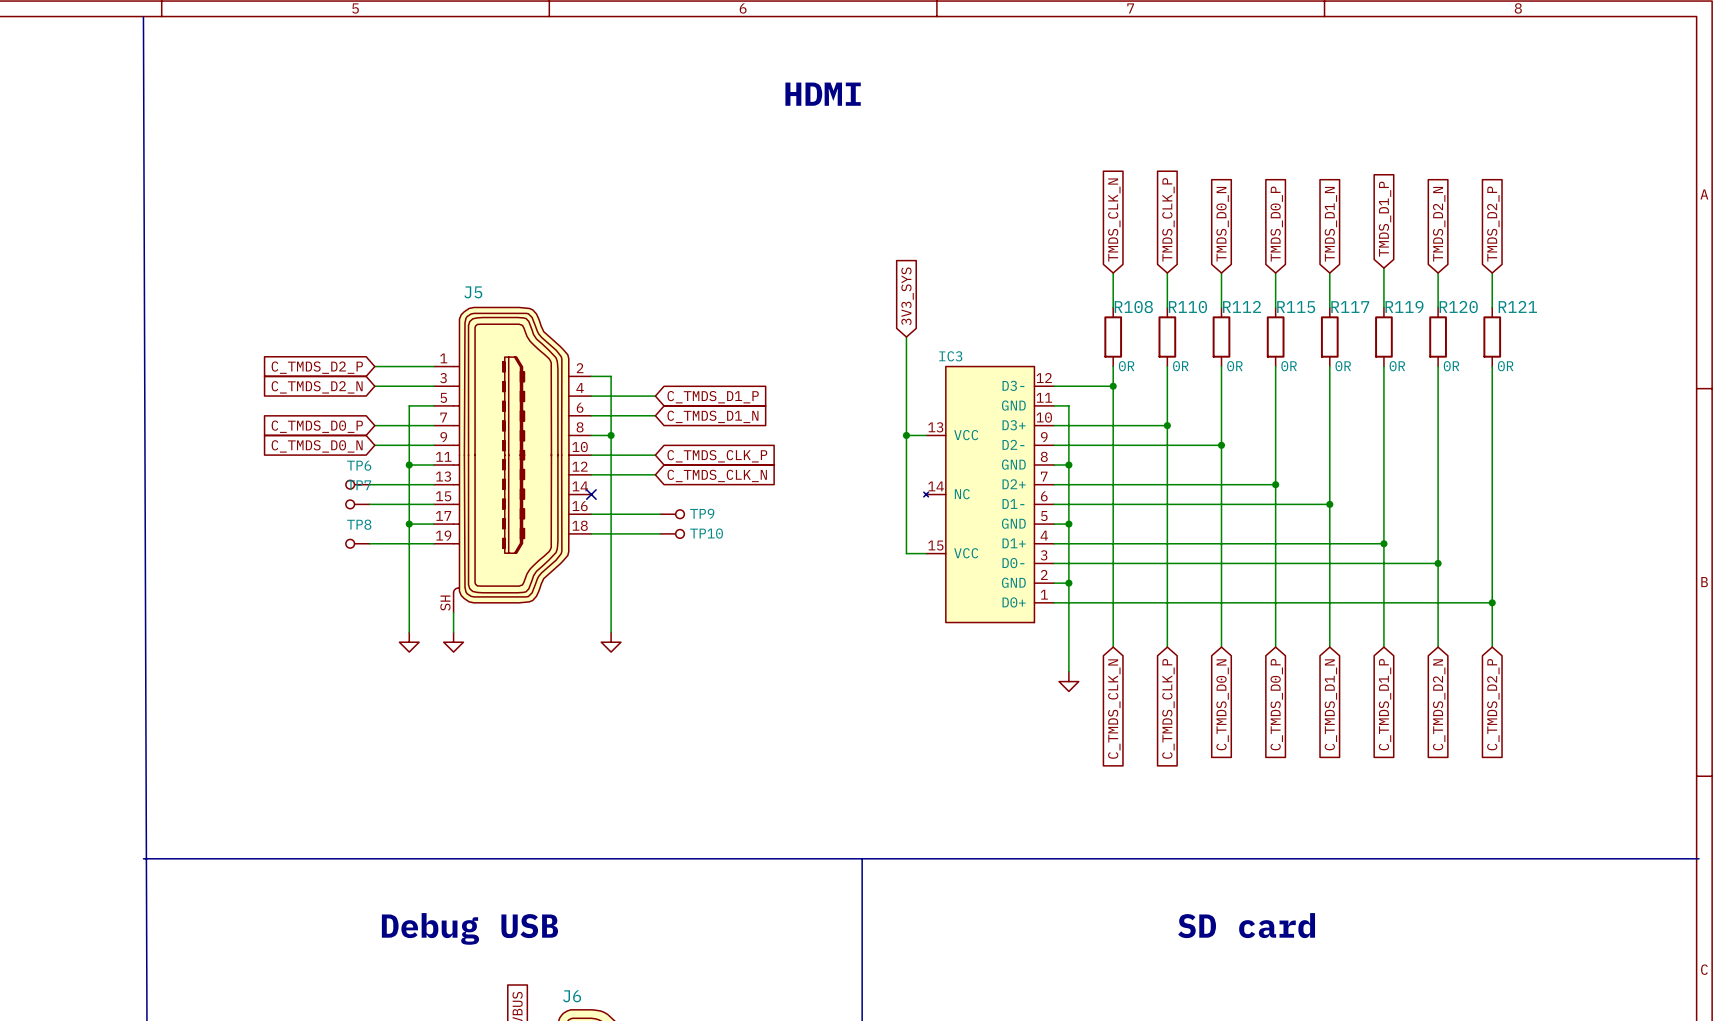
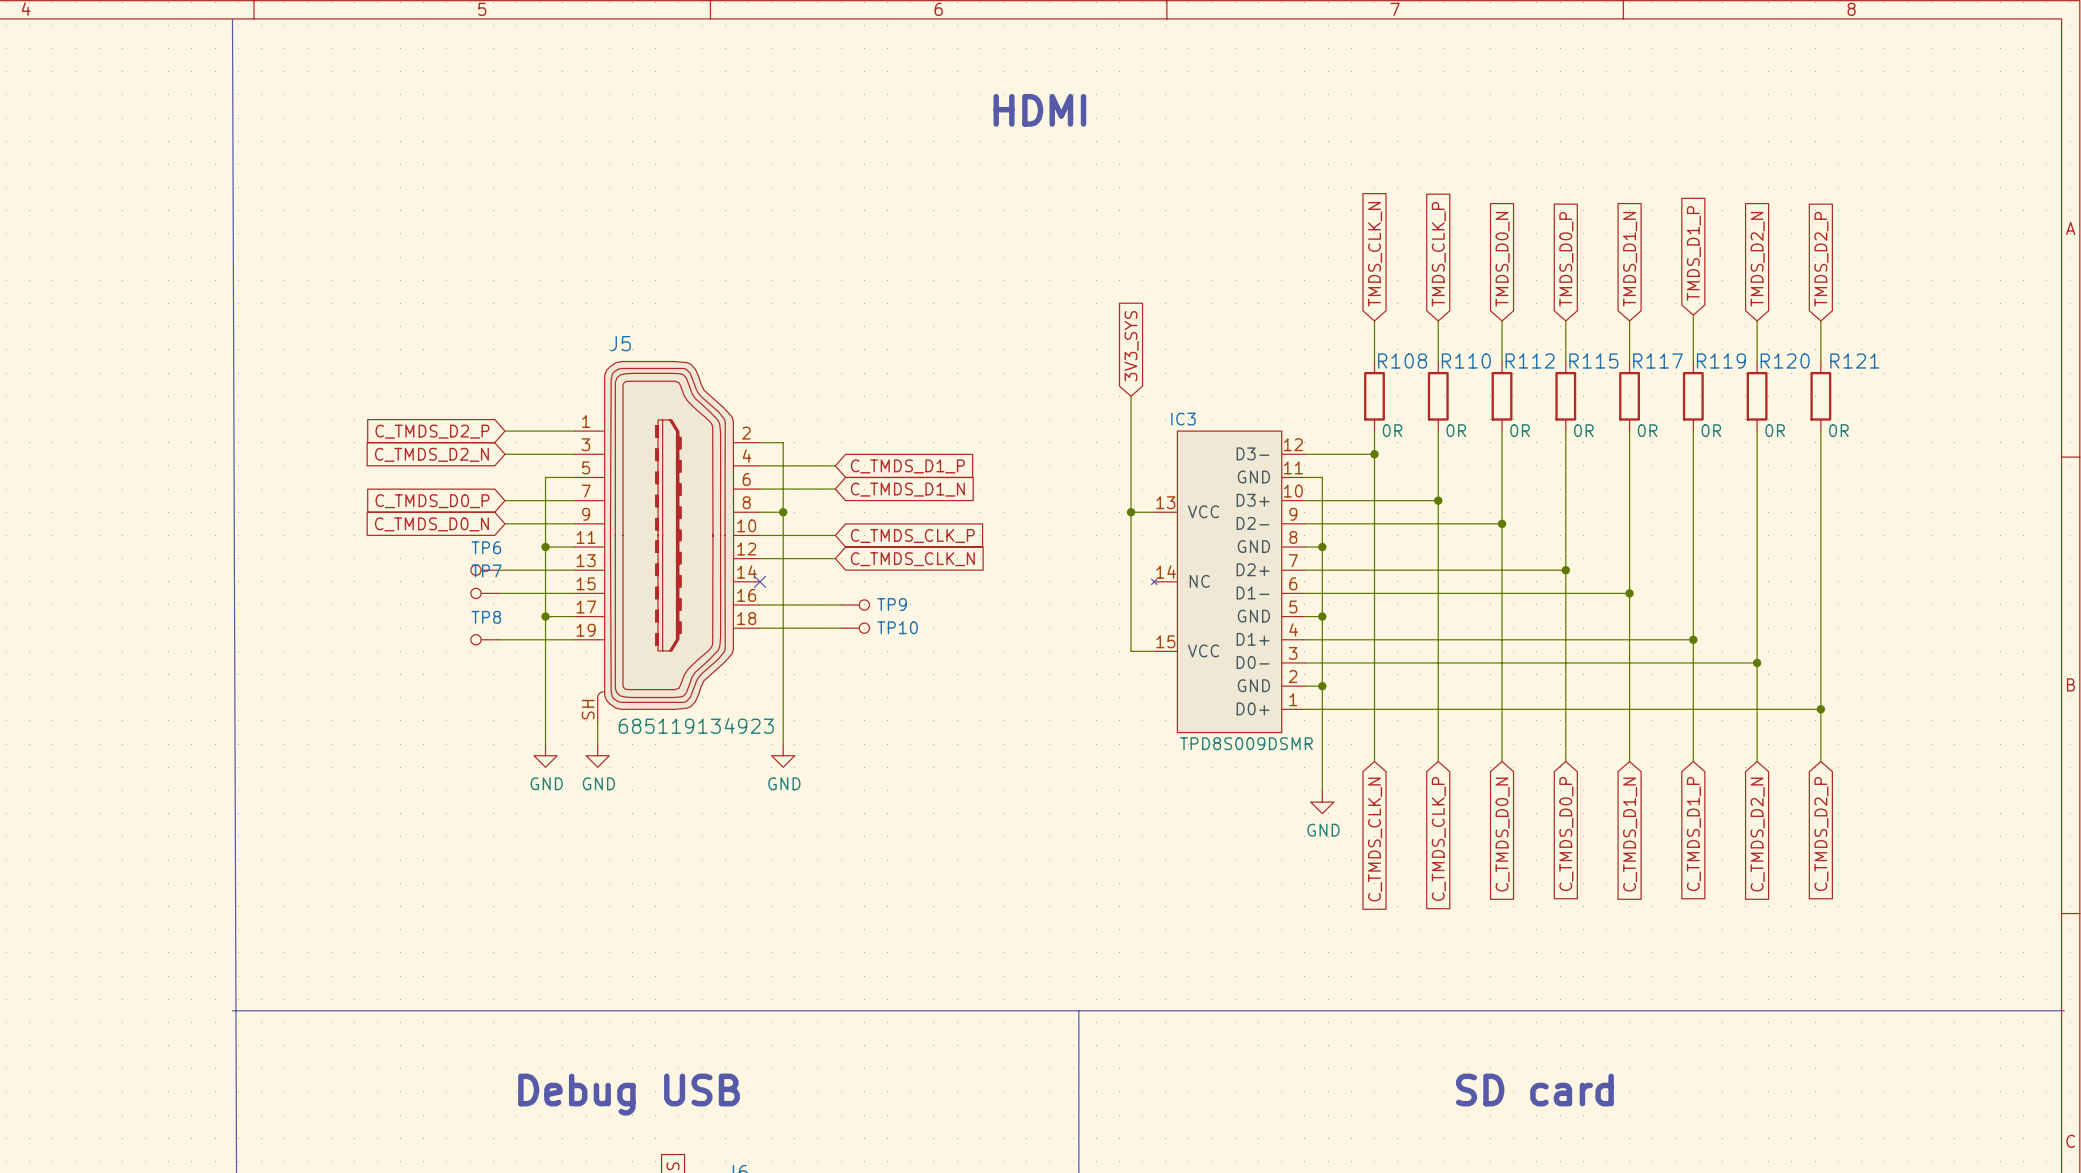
J5 value: none -> 685119134923 (696, 725)
IC3 value: none -> TPD8S009DSMR (1246, 743)
power symbol text: none -> GND (546, 783)
power symbol text: none -> GND (598, 783)
power symbol text: none -> GND (784, 783)
power symbol text: none -> GND (1323, 830)

